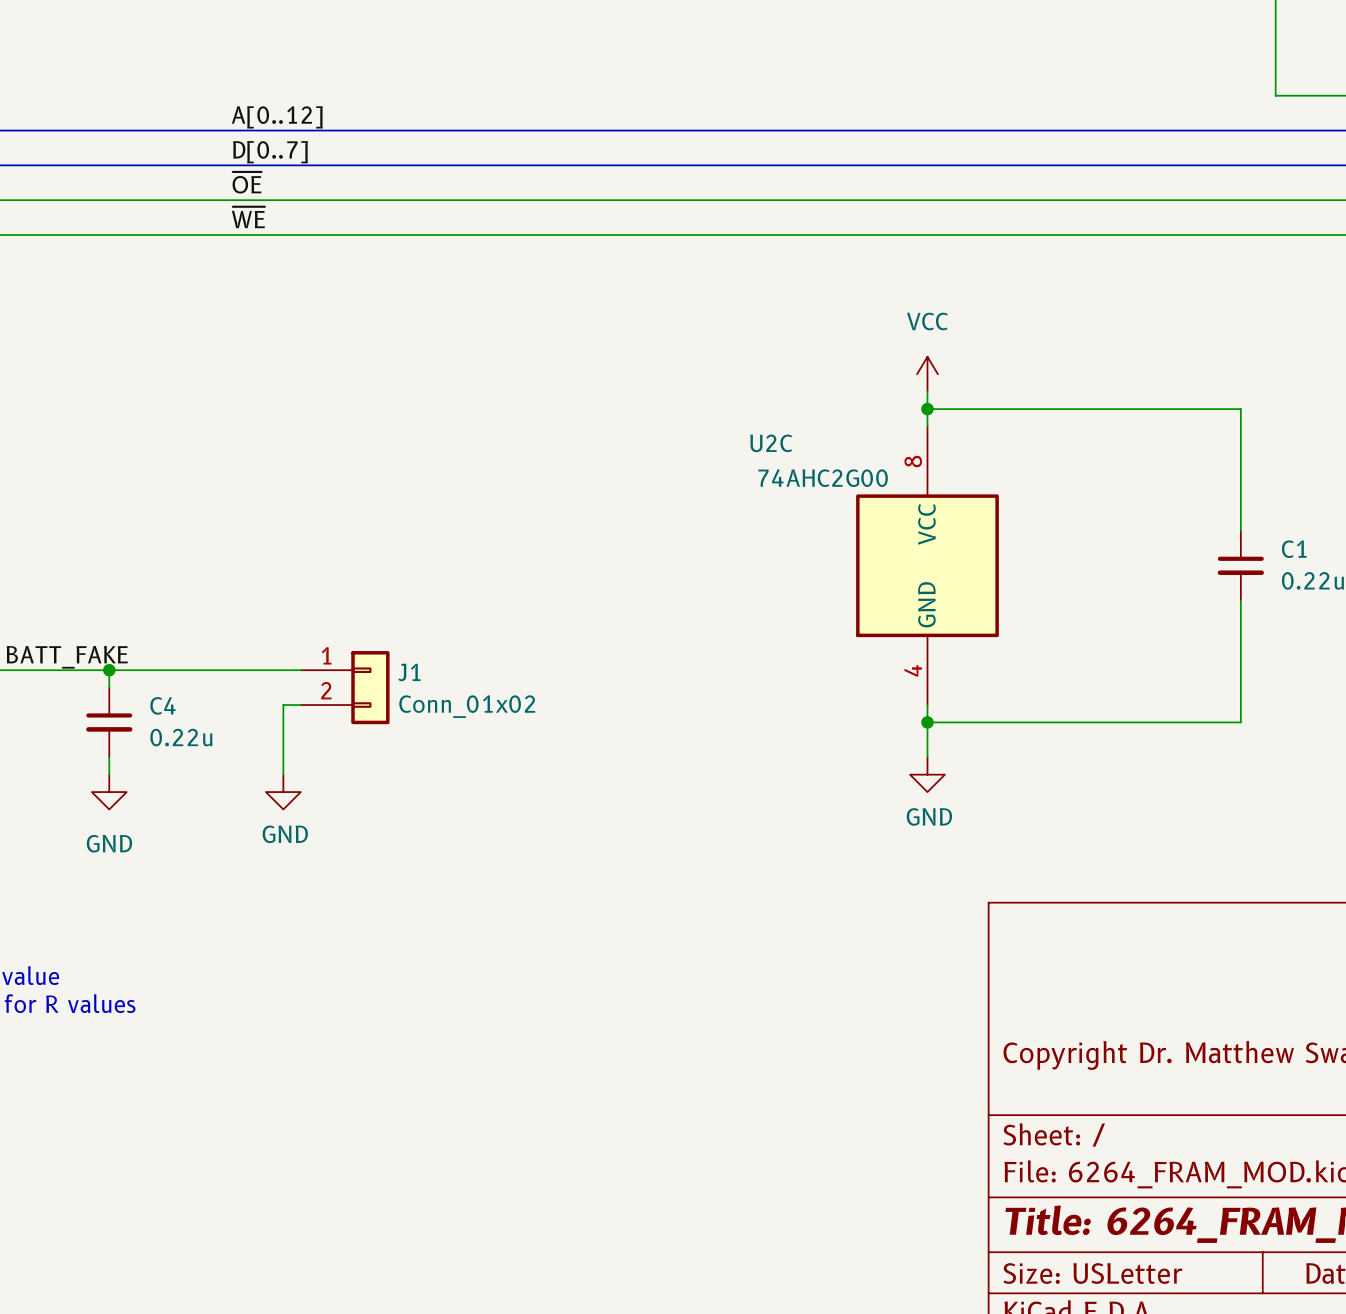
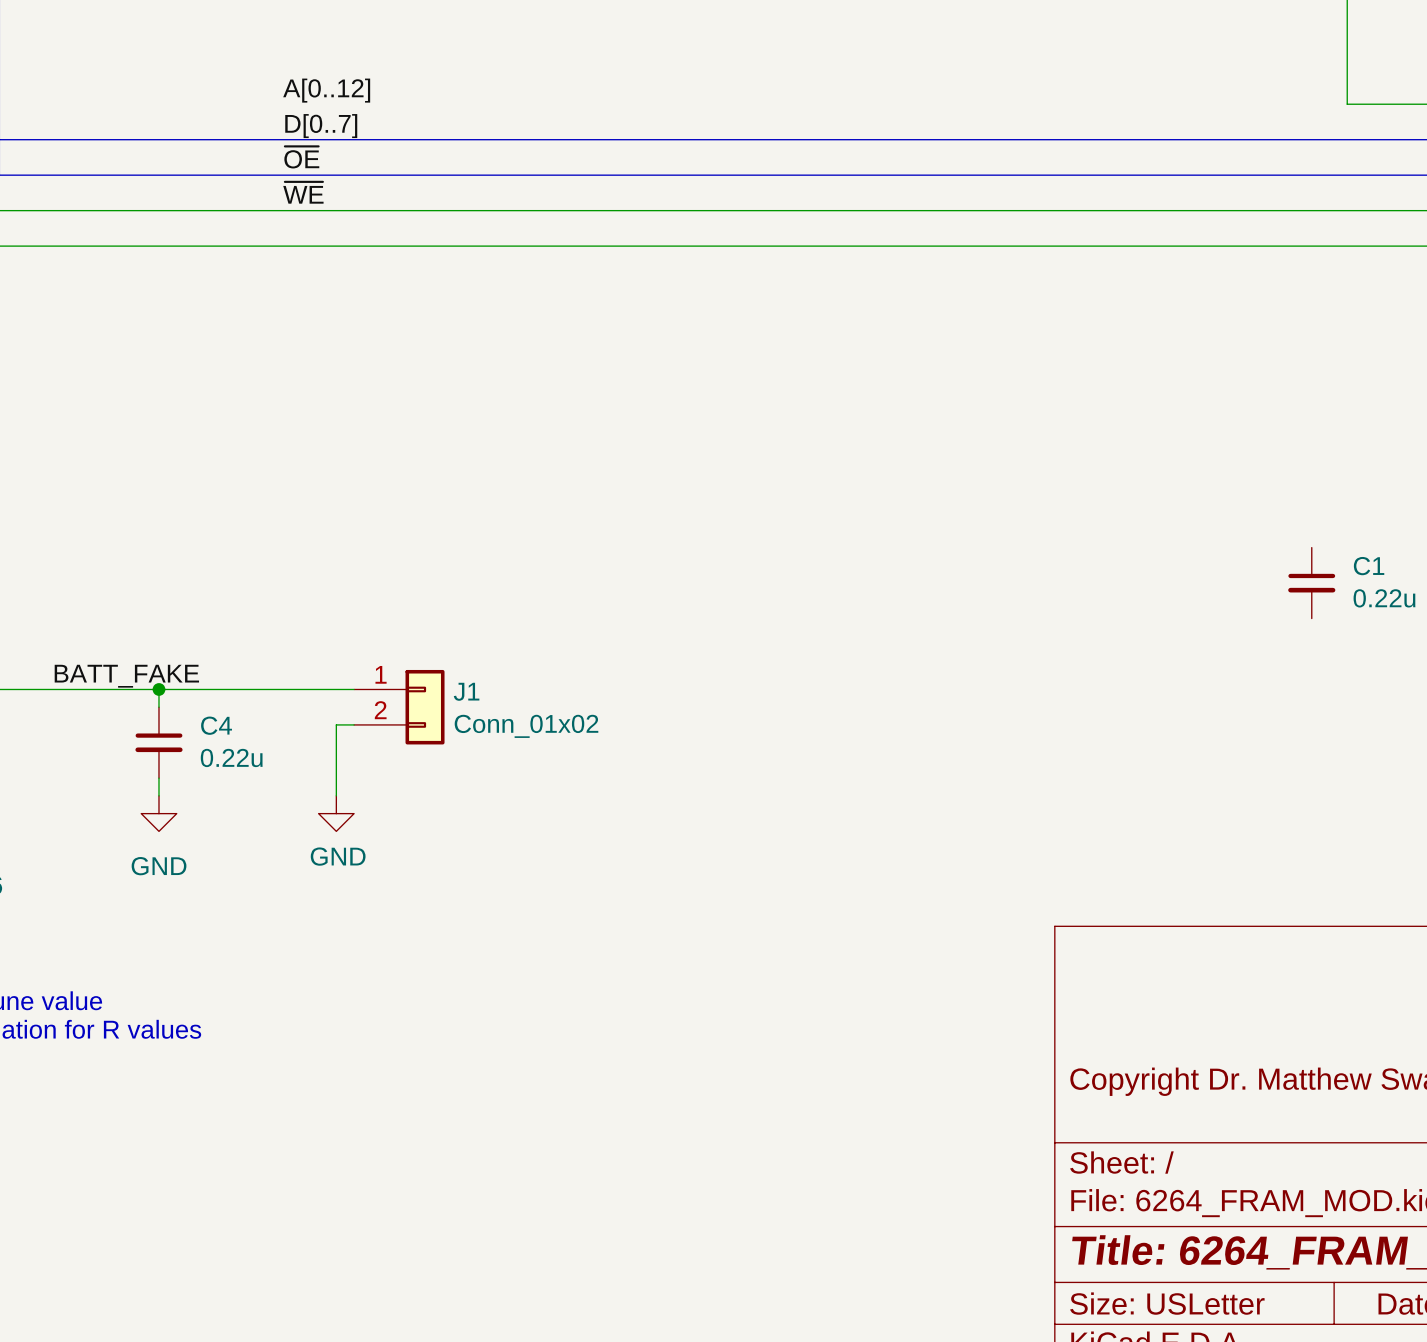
label: none -> A[0..12] (326, 90)
label: A[0..12] (277, 117) -> D[0..7] (321, 126)
label: D[0..7] (270, 152) -> ~{OE} (301, 157)
label: ~{OE} (247, 182) -> ~{WE} (303, 192)
label: ~{WE} (248, 217) -> none
power symbol: VCC (927, 374) -> none
wire: (927, 391) (927, 426) -> none
wire: (927, 409) (1240, 409) (1240, 530) -> none
junction: (927, 409) -> none
U2C: 74AHC2G00 (927, 565) -> none
wire: (1240, 600) (1240, 722) (927, 722) -> none
wire: (927, 705) (927, 757) -> none
junction: (927, 722) -> none
power symbol: GND (927, 774) -> none

